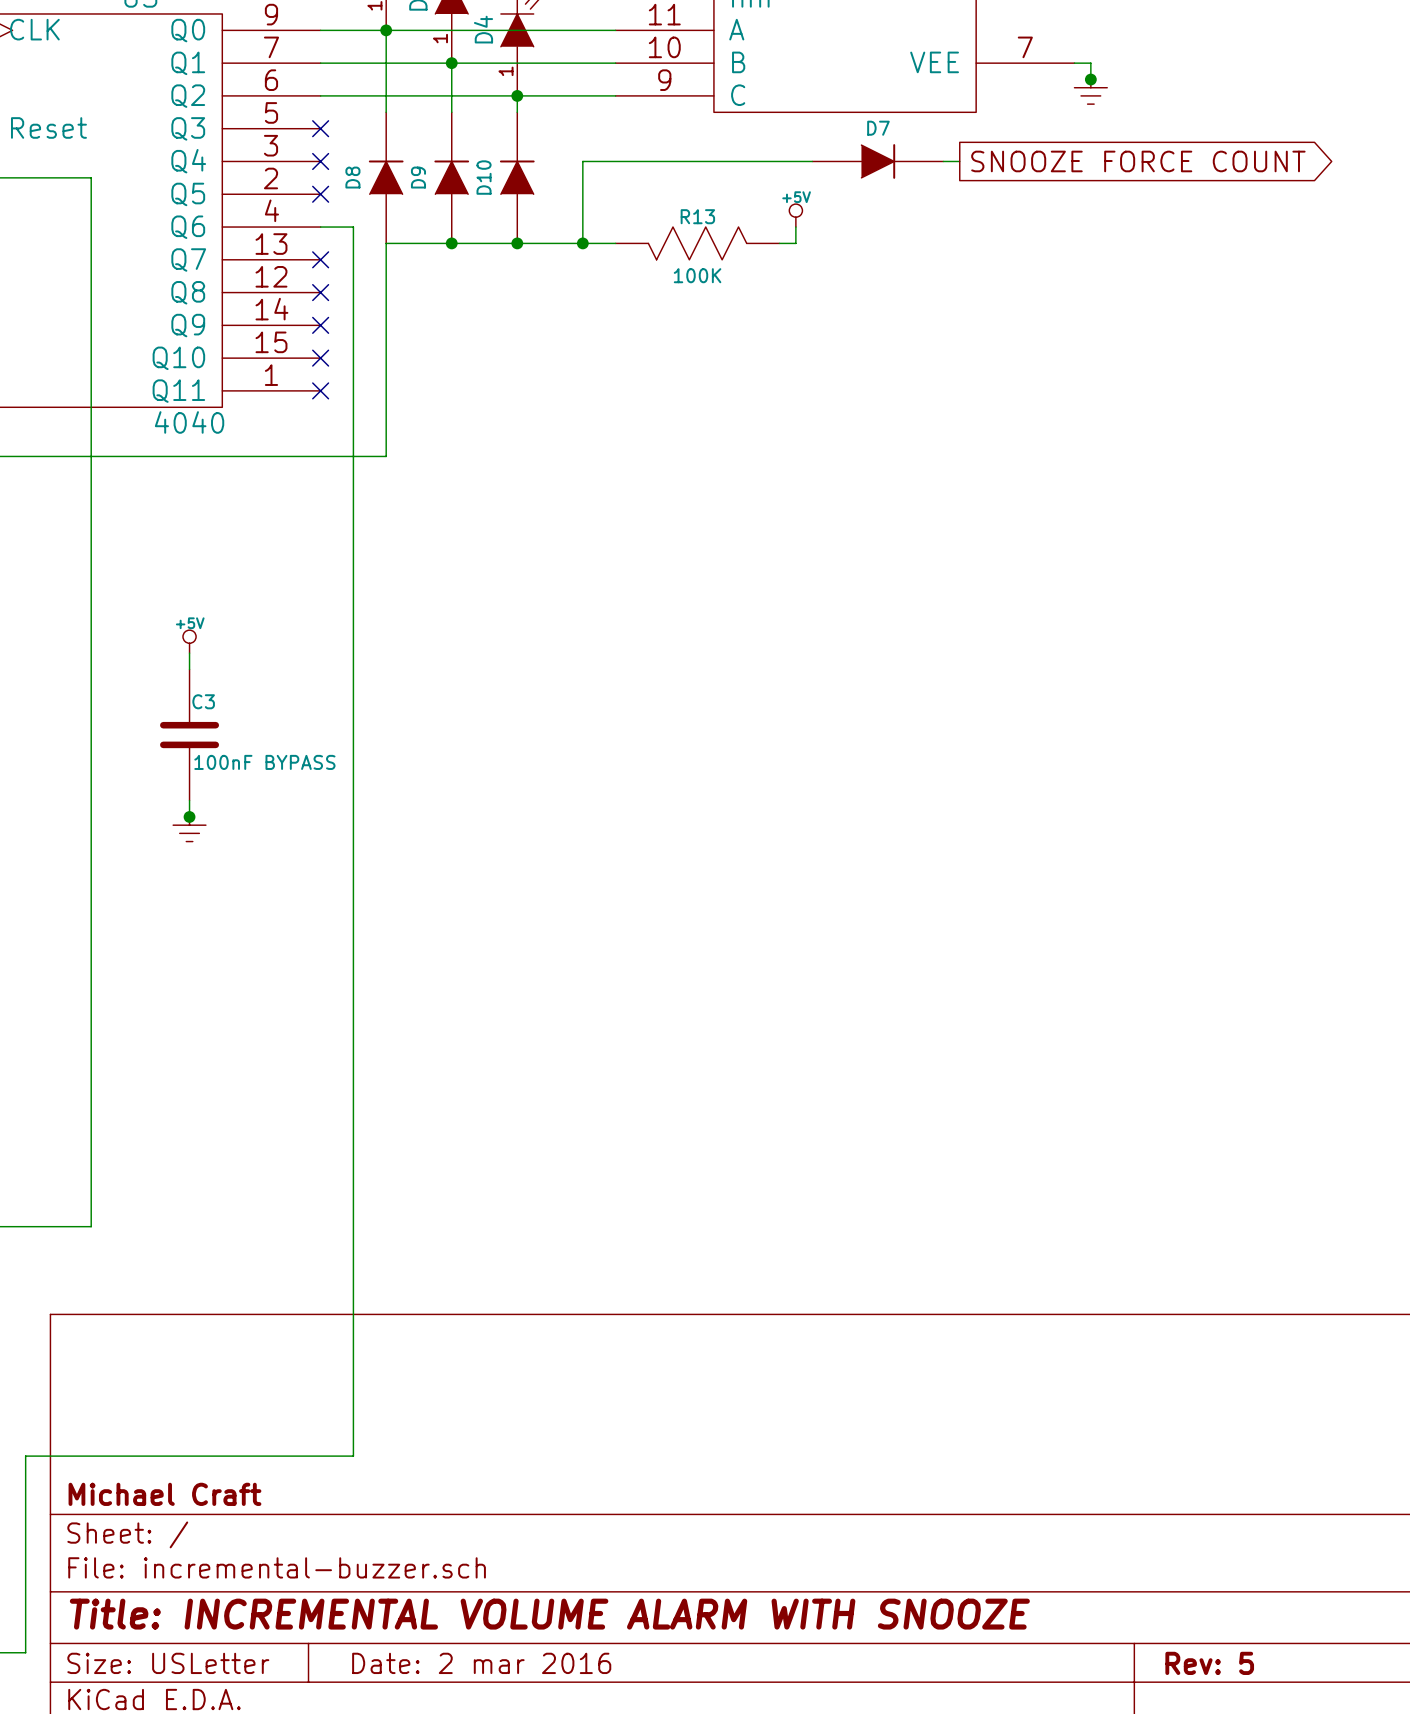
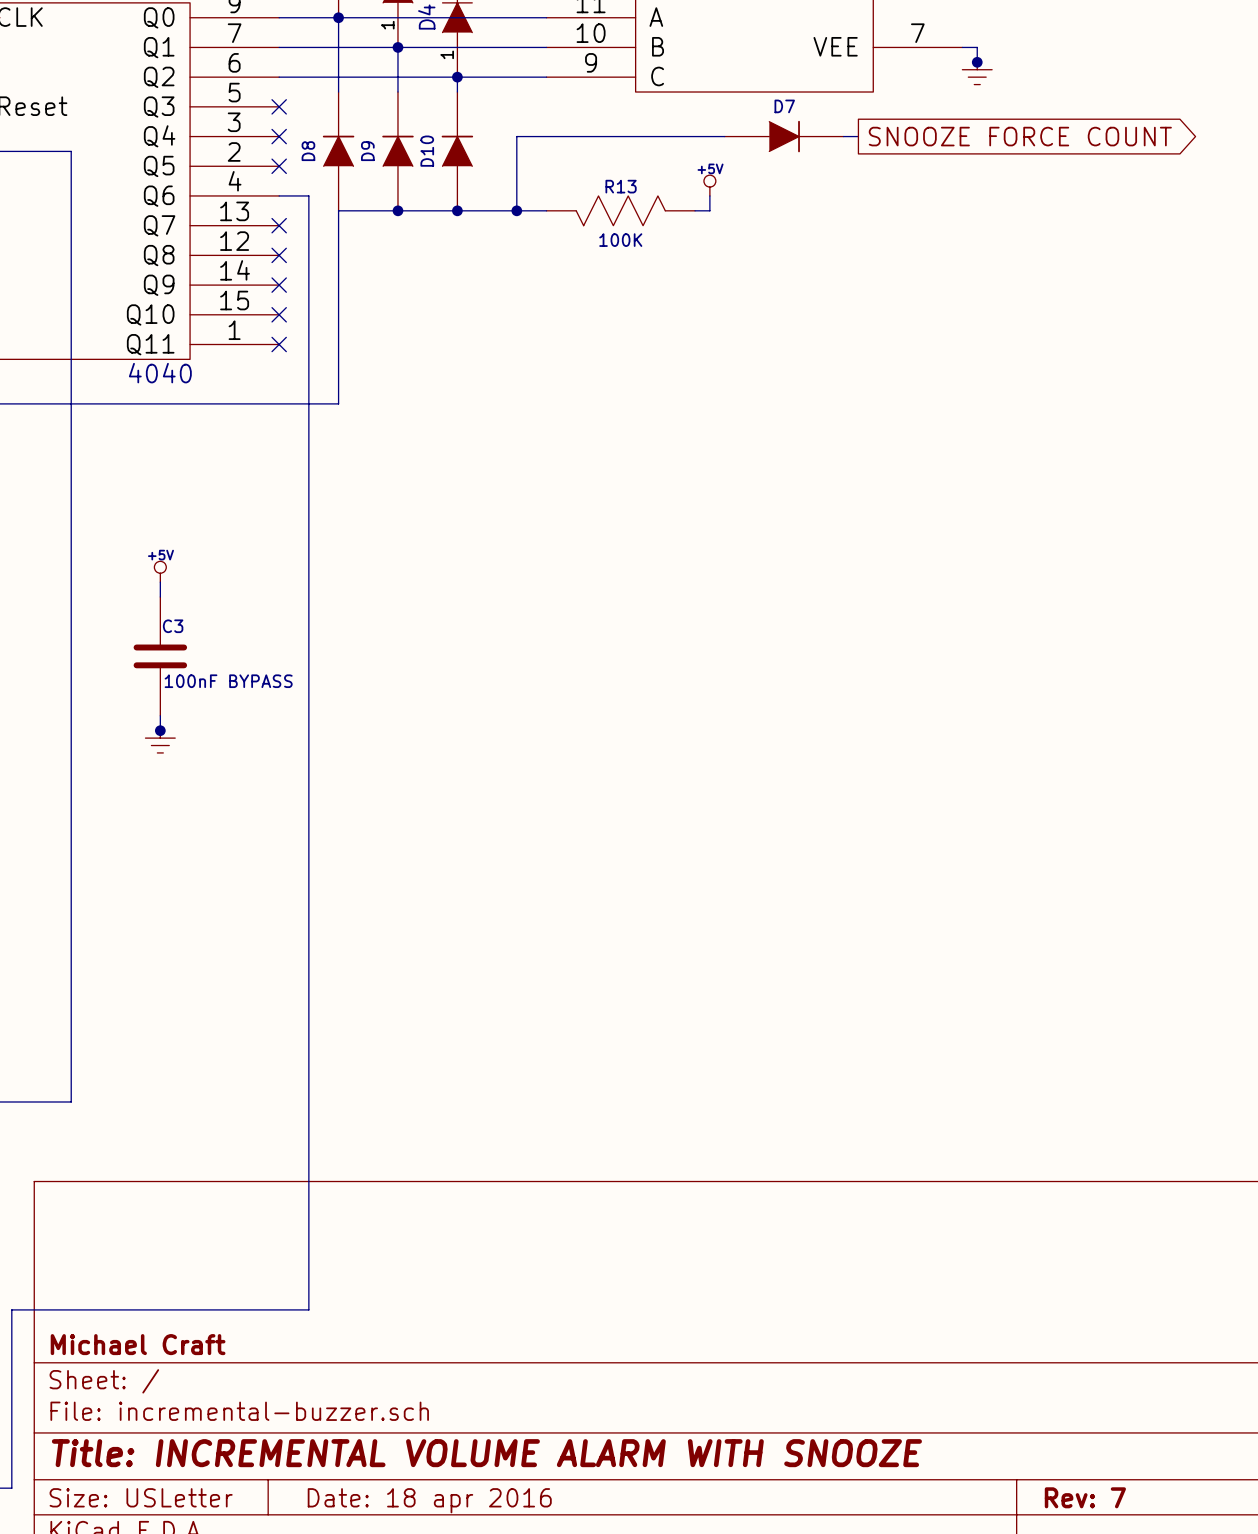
title block: Date: 2 mar 2016 (481, 1663) -> Date: 18 apr 2016 (429, 1500)
title block: Rev: 5 (1209, 1663) -> Rev: 7 (1085, 1497)

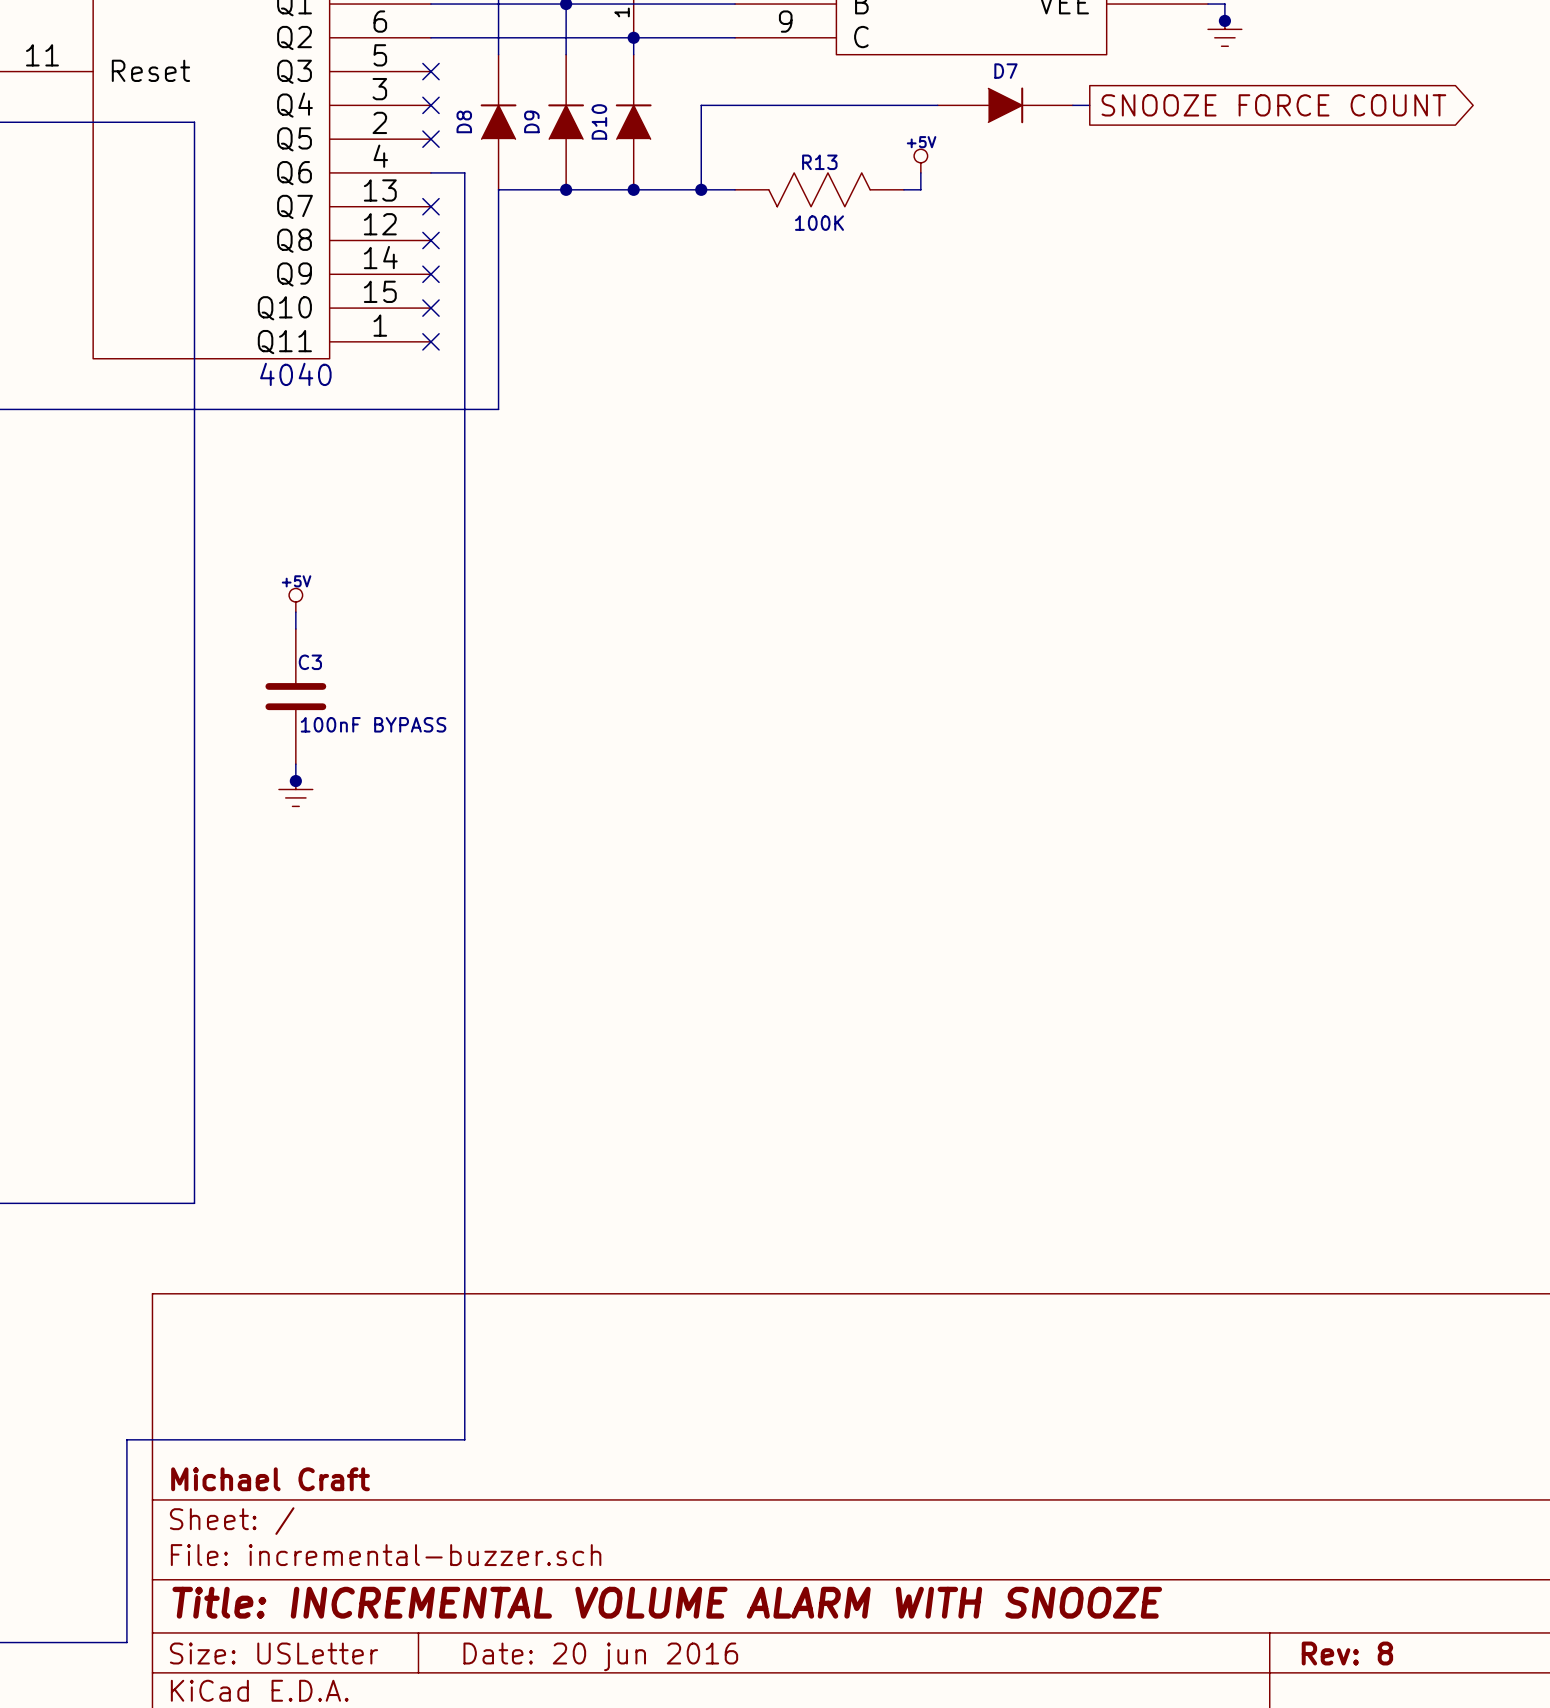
title block: Rev: 7 (1085, 1497) -> Rev: 8 (1347, 1653)
title block: Date: 18 apr 2016 (429, 1500) -> Date: 20 jun 2016 (600, 1656)

